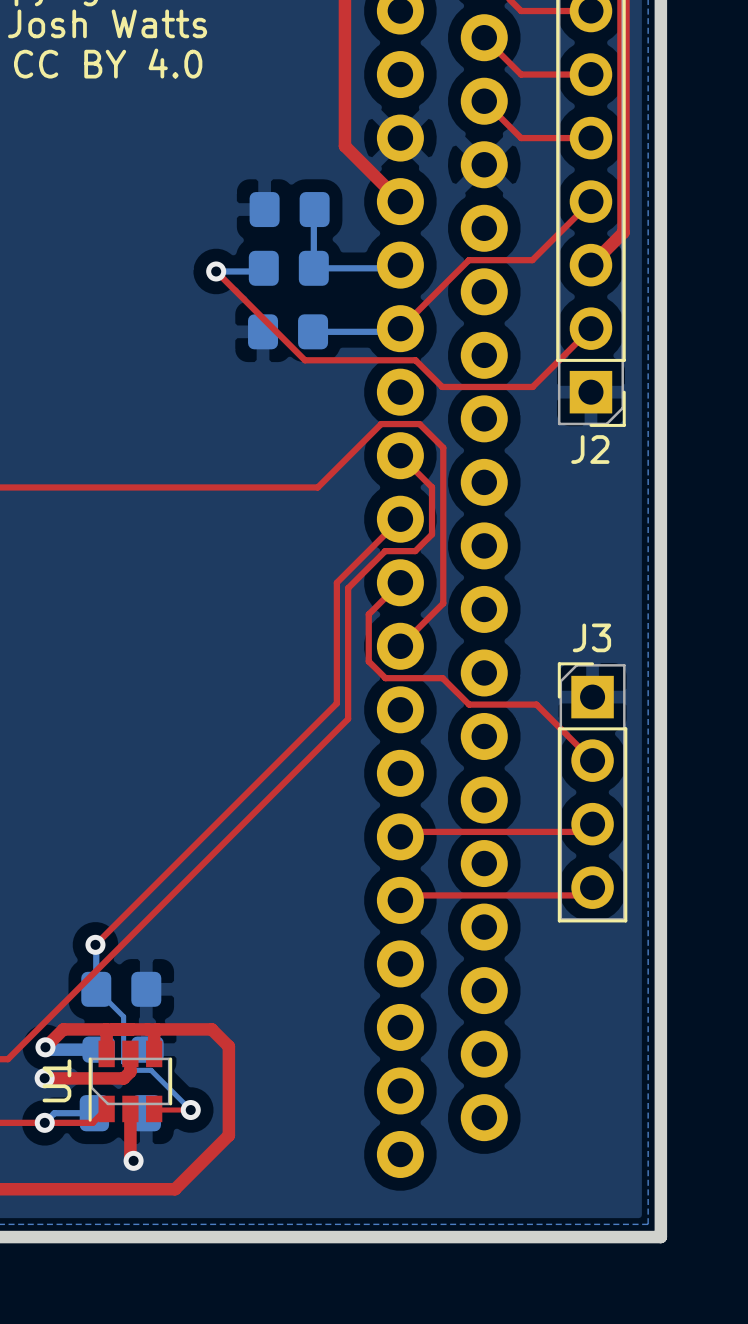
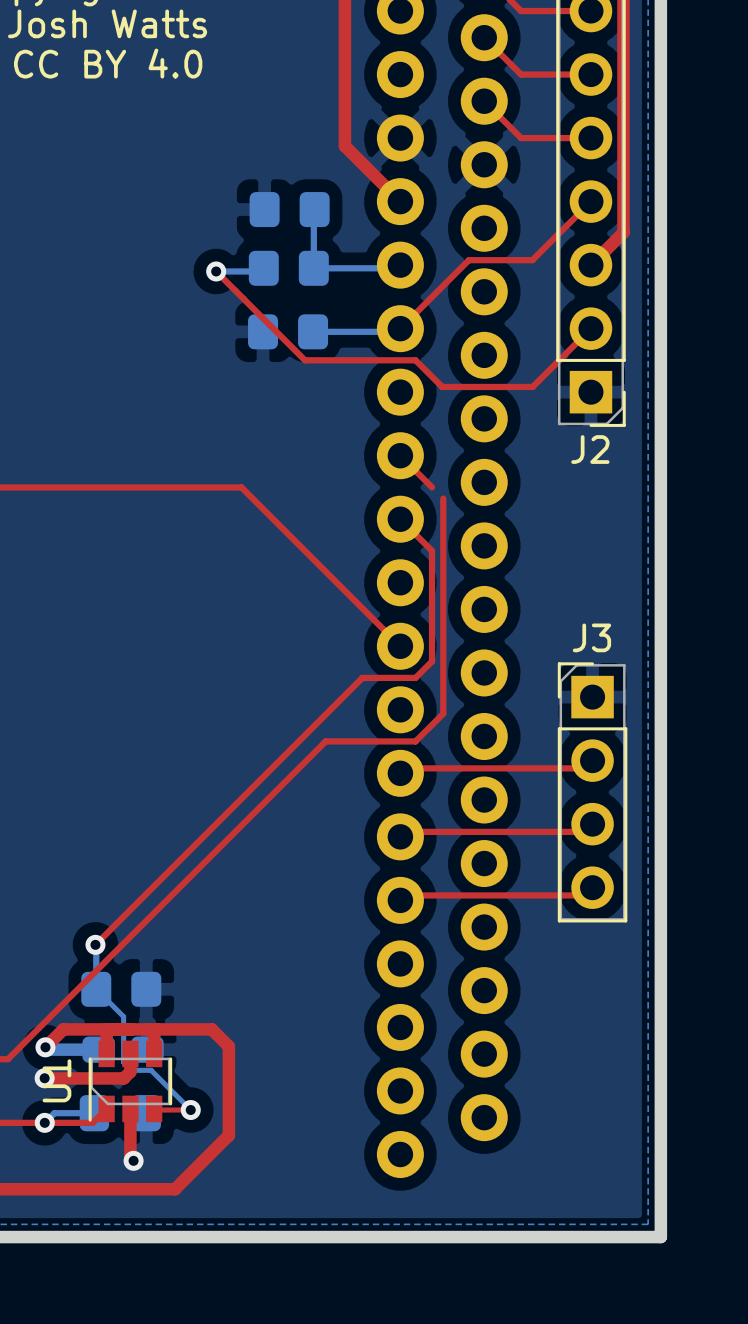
top track: (241, 487) (317, 487) (381, 424) (419, 424) (443, 447) (443, 498) -> (241, 487) (400, 646)
top track: (432, 487) (432, 534) (415, 551) (385, 551) (348, 588) (348, 719) (325, 741) -> (443, 603) (443, 713) (415, 741) (325, 741)
top track: (400, 519) (336, 582) (336, 703) -> (400, 519) (432, 550) (432, 661) (415, 677) (362, 677) (336, 703)
top track: (400, 582) (368, 614) (368, 661) (385, 678) (442, 678) (469, 704) (536, 704) (592, 760) -> (400, 773) (405, 768) (584, 768) (592, 760)
top track: (443, 603) (400, 646) -> none

